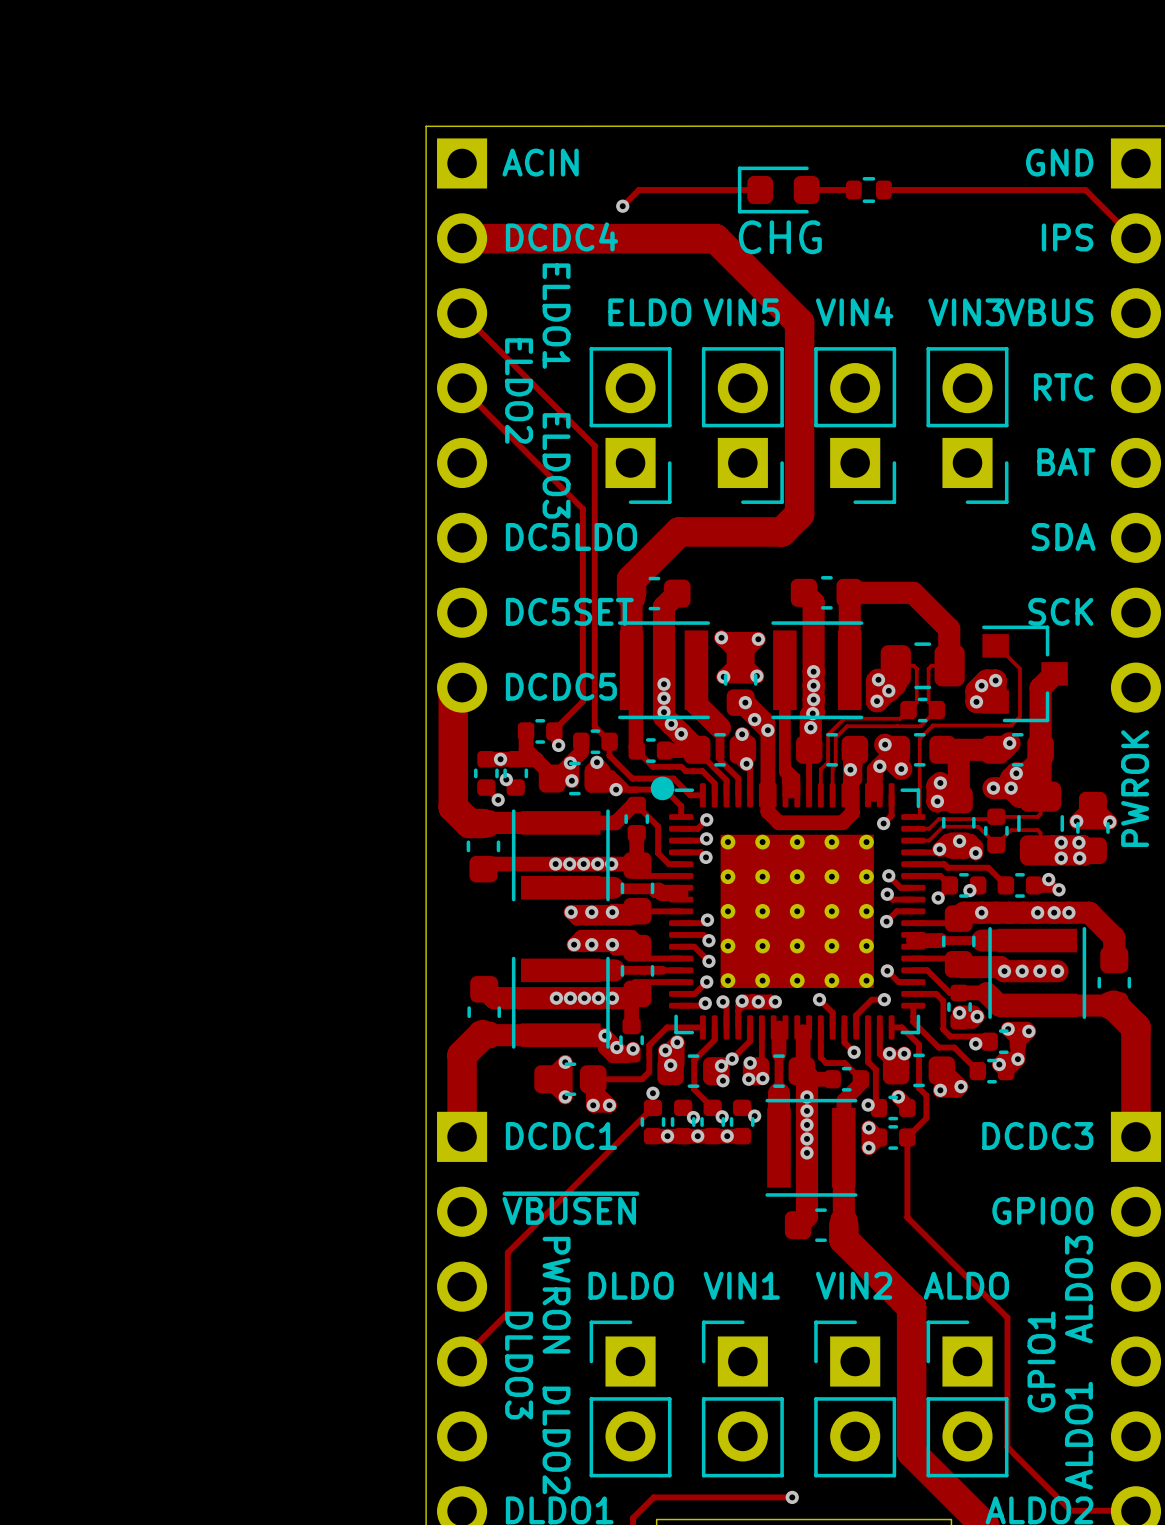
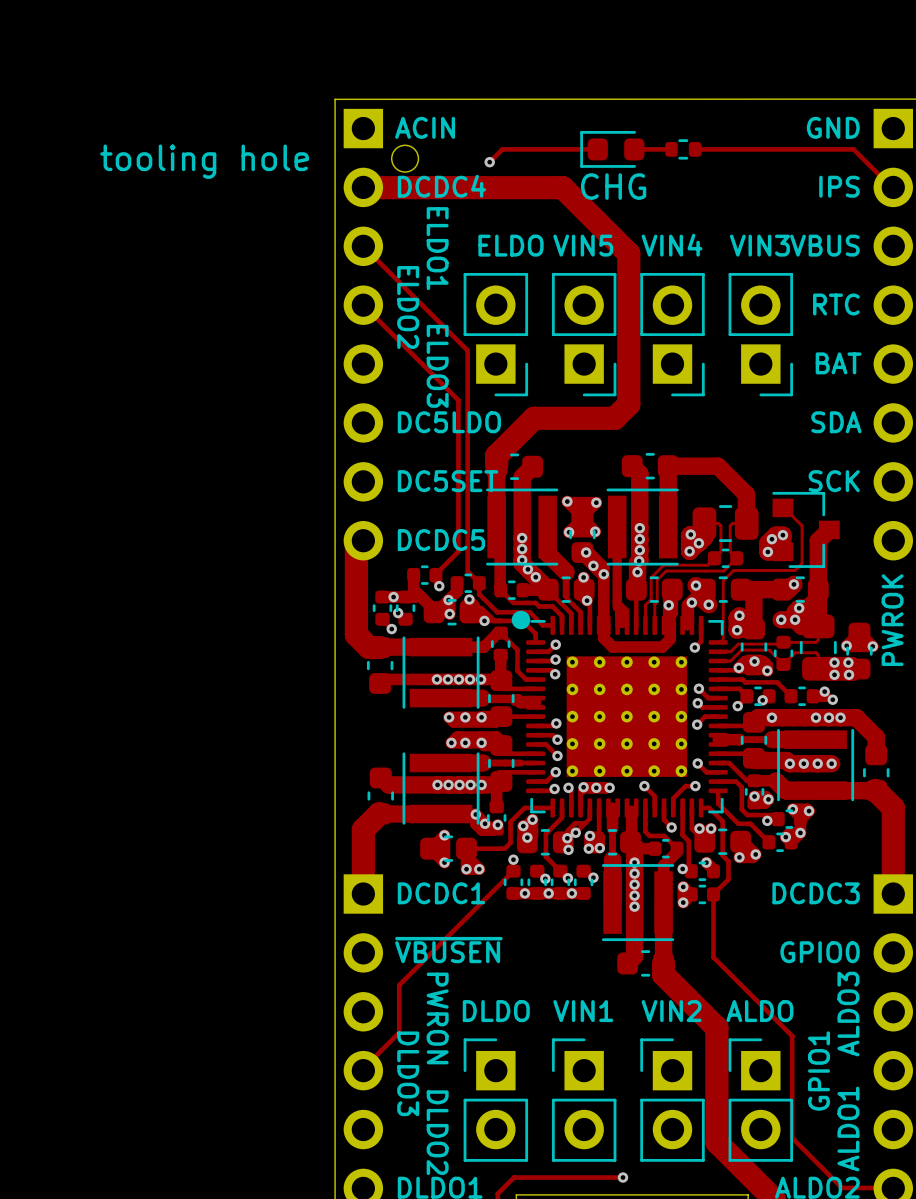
part: none -> (405, 158)
track: none -> (585, 823) (575, 823) (567, 830)

